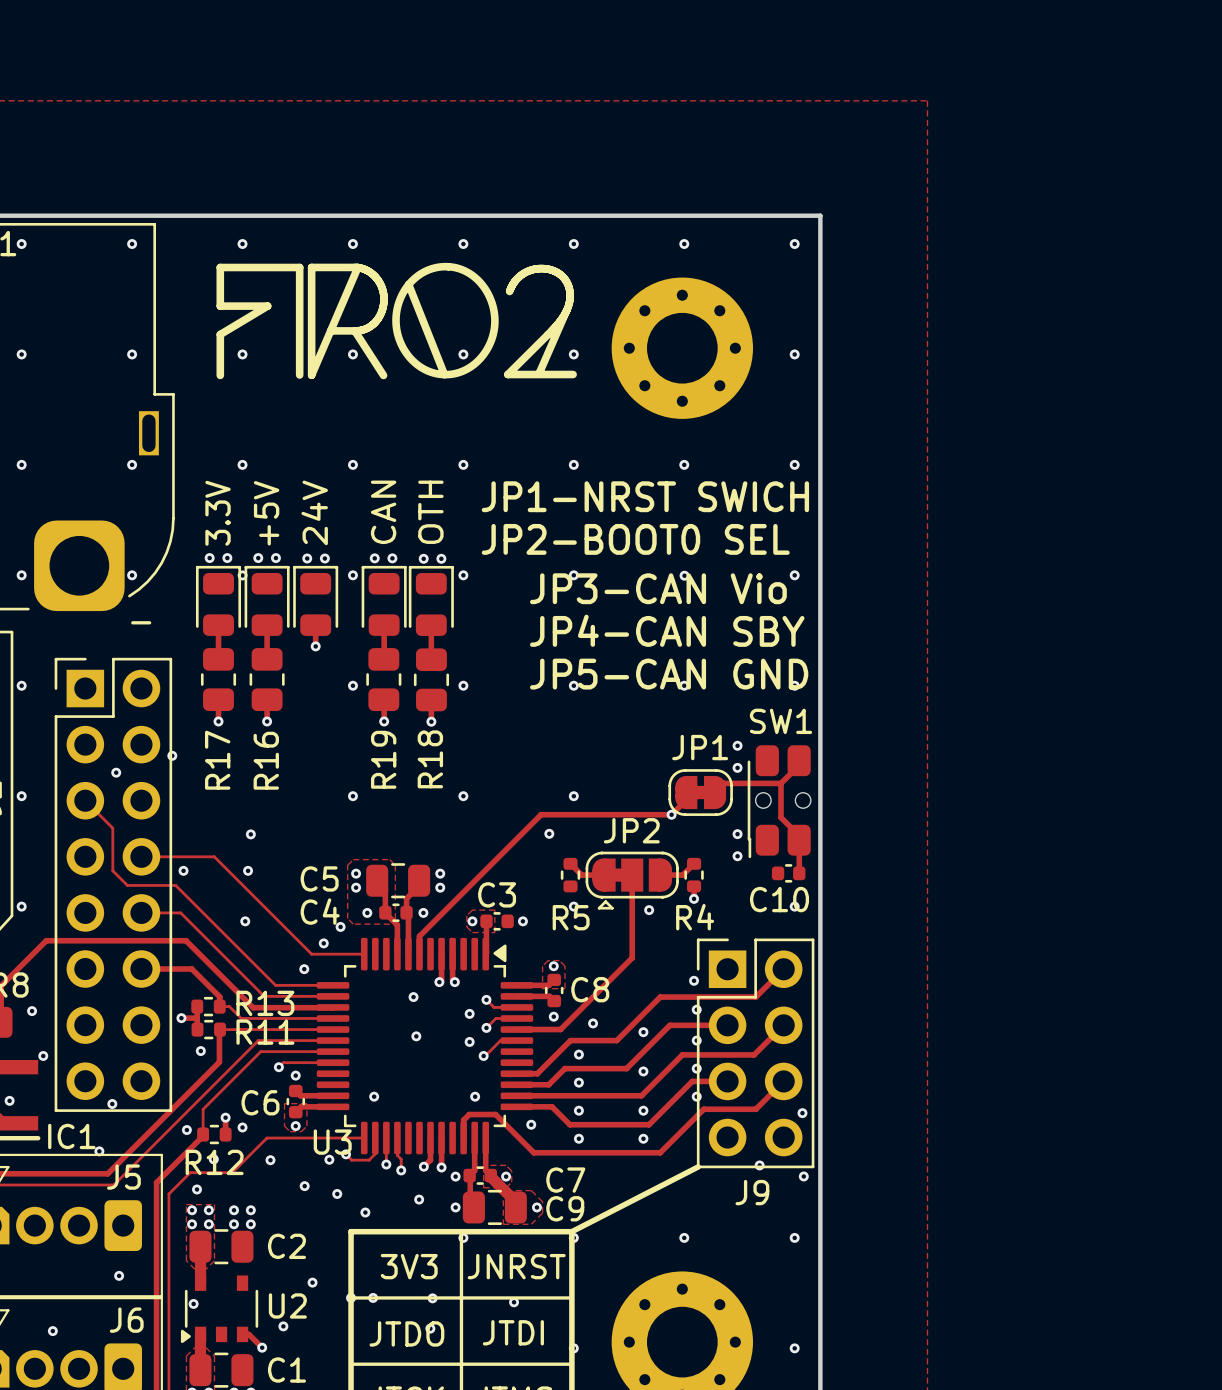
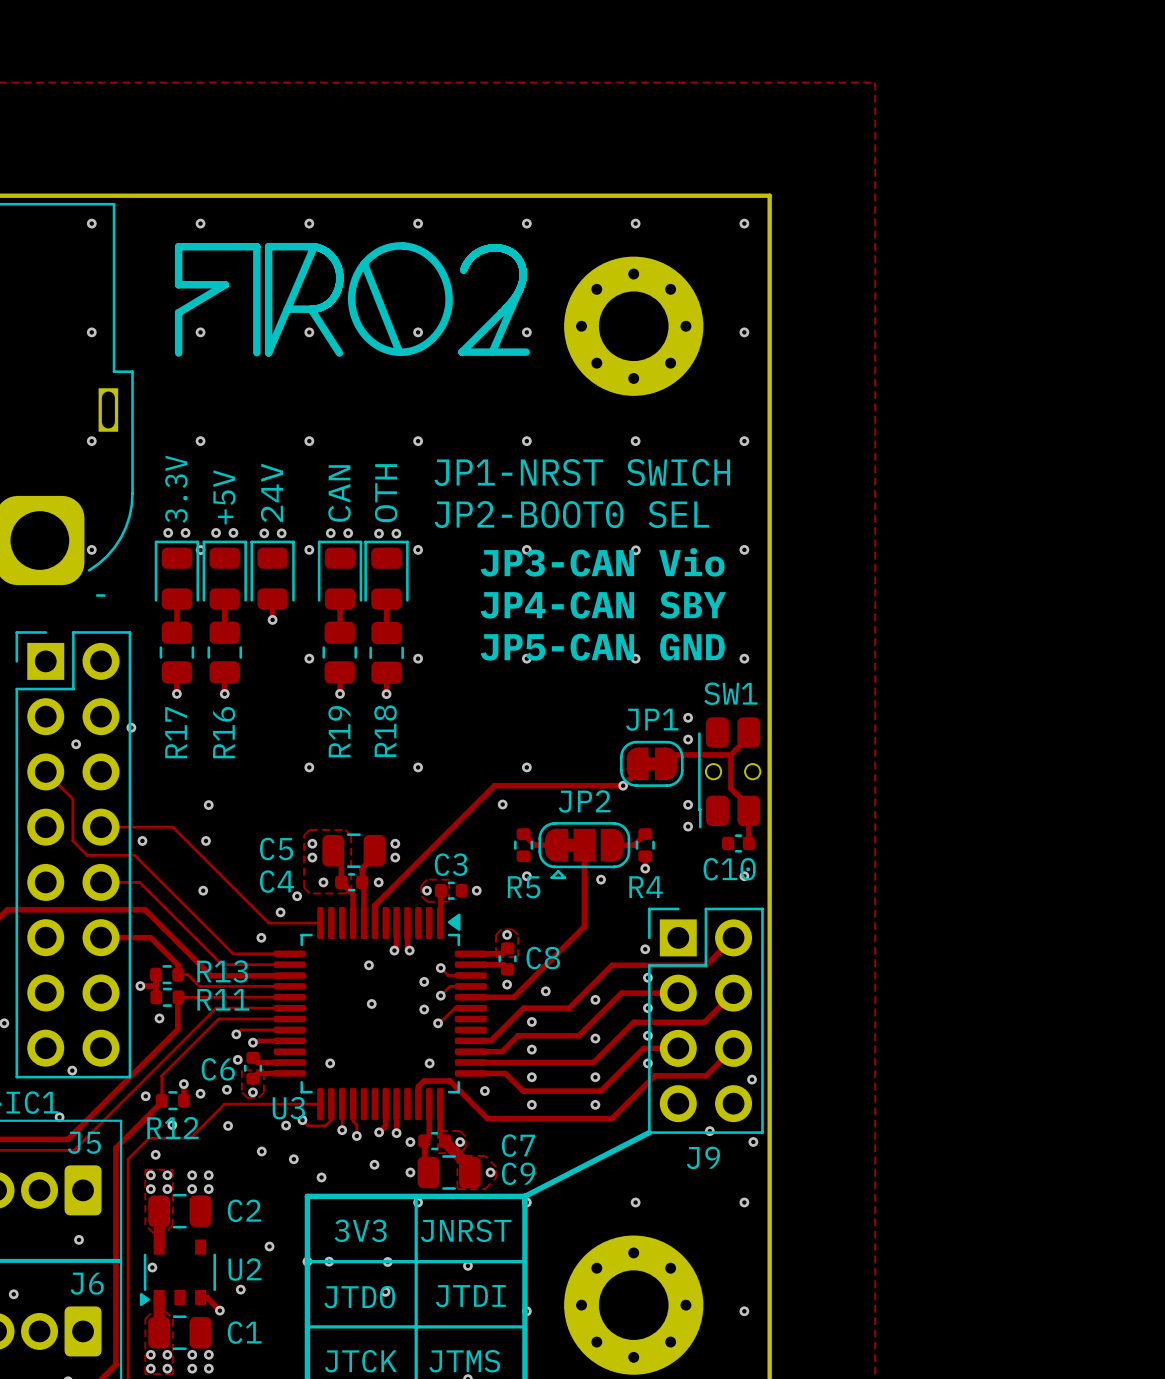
track: none -> (289, 1040) (259, 1040) (257, 1042)
via: none -> (237, 1059)
via: none -> (226, 1089)

